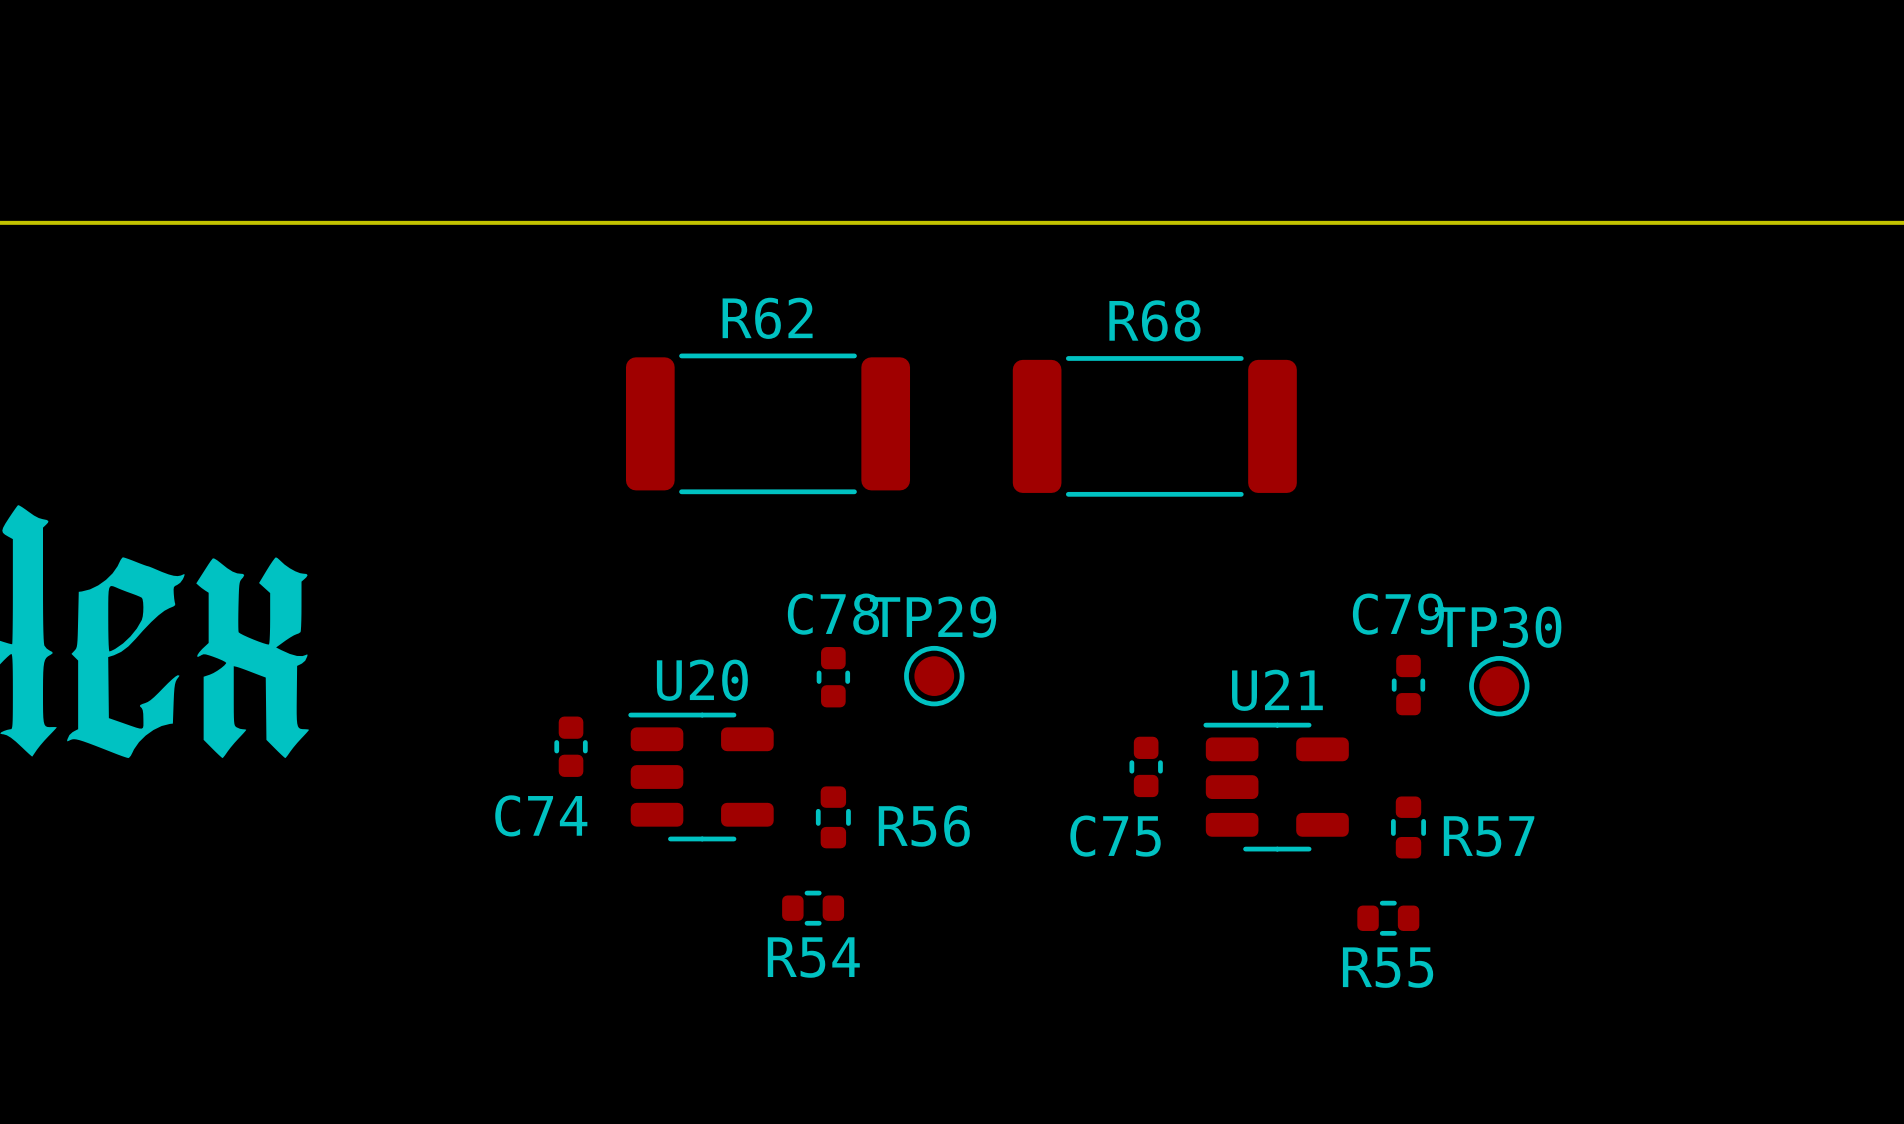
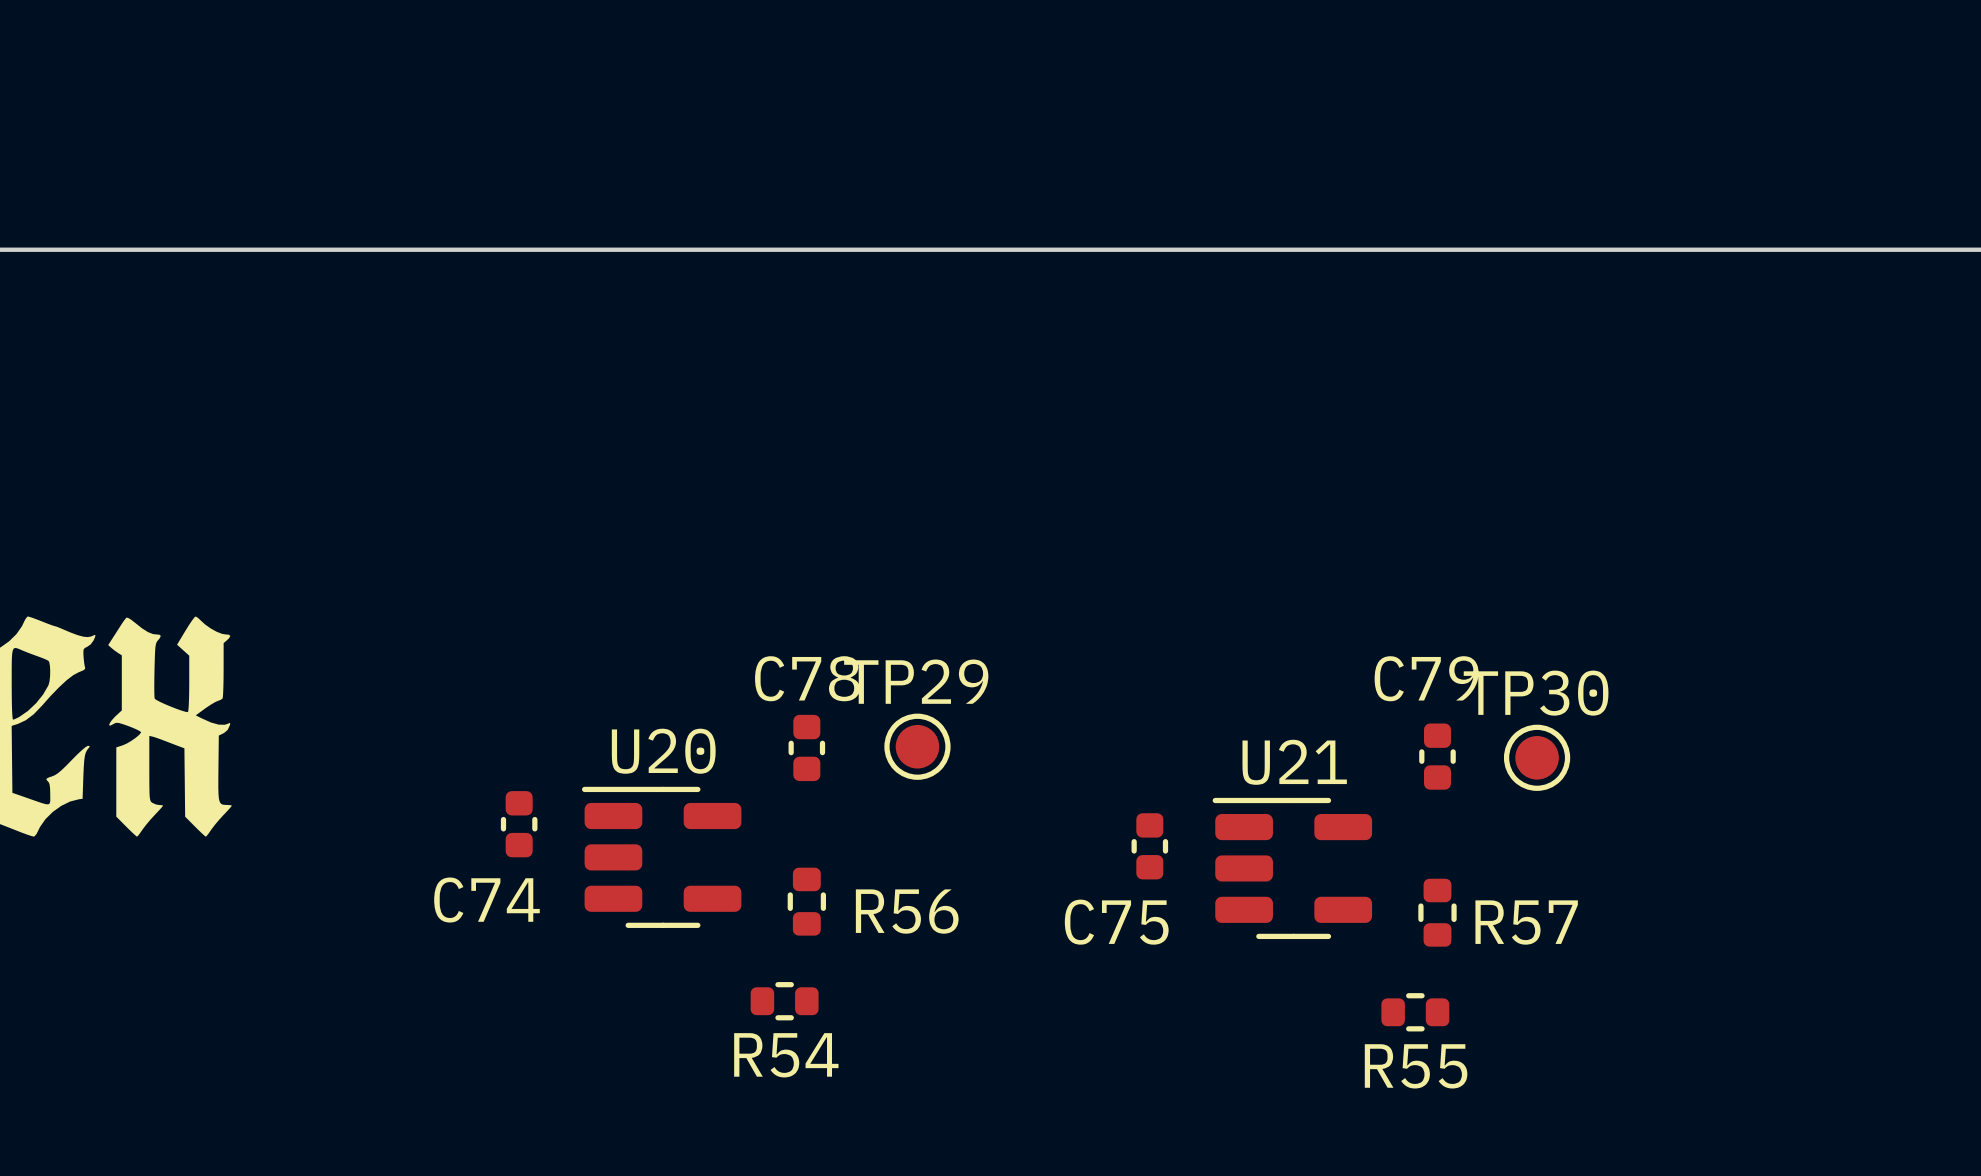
R62: (768, 423) -> none
R68: (1154, 426) -> none

